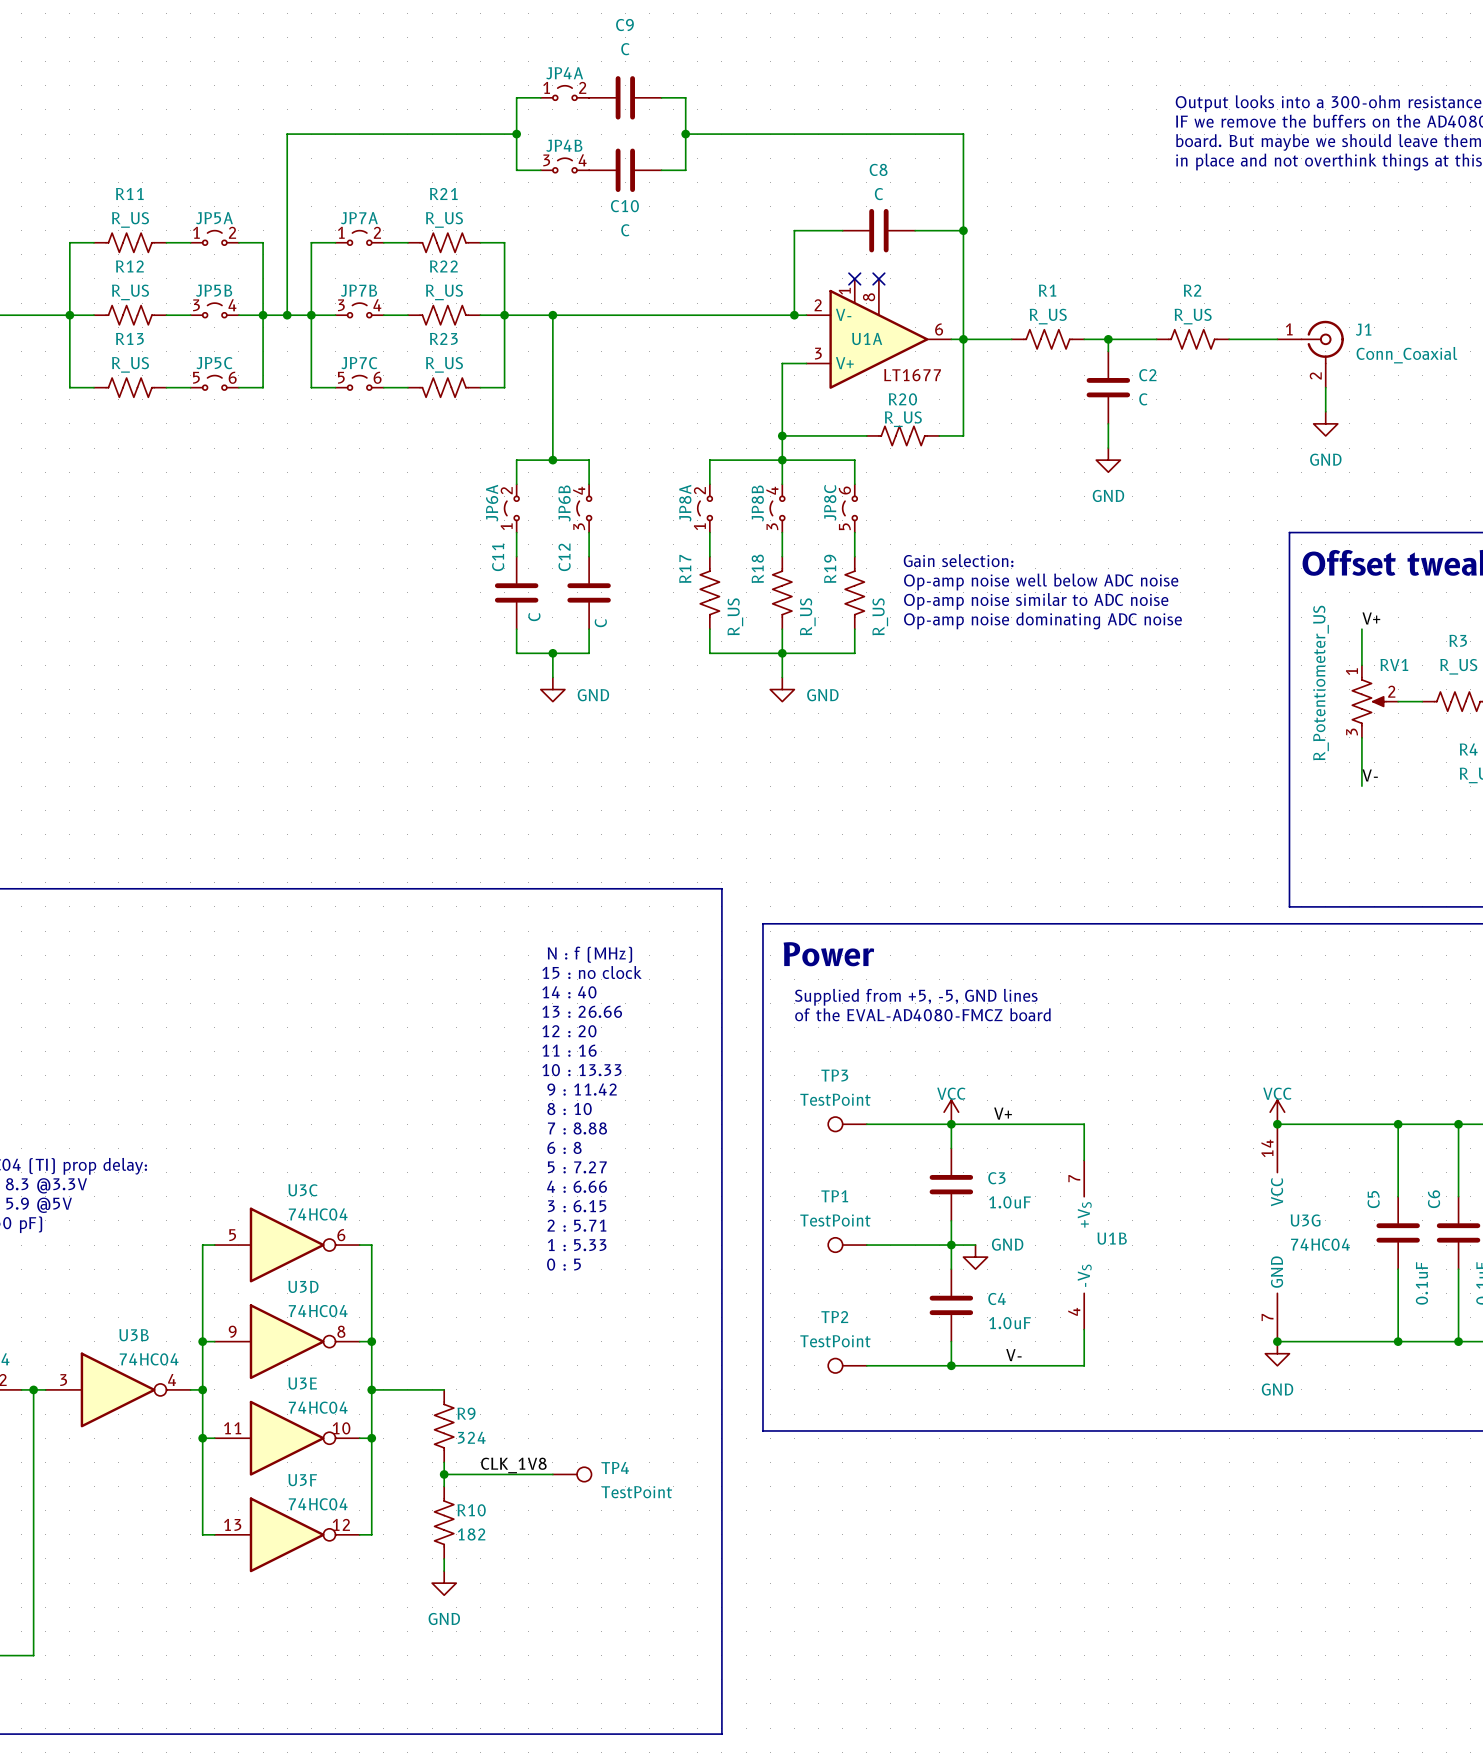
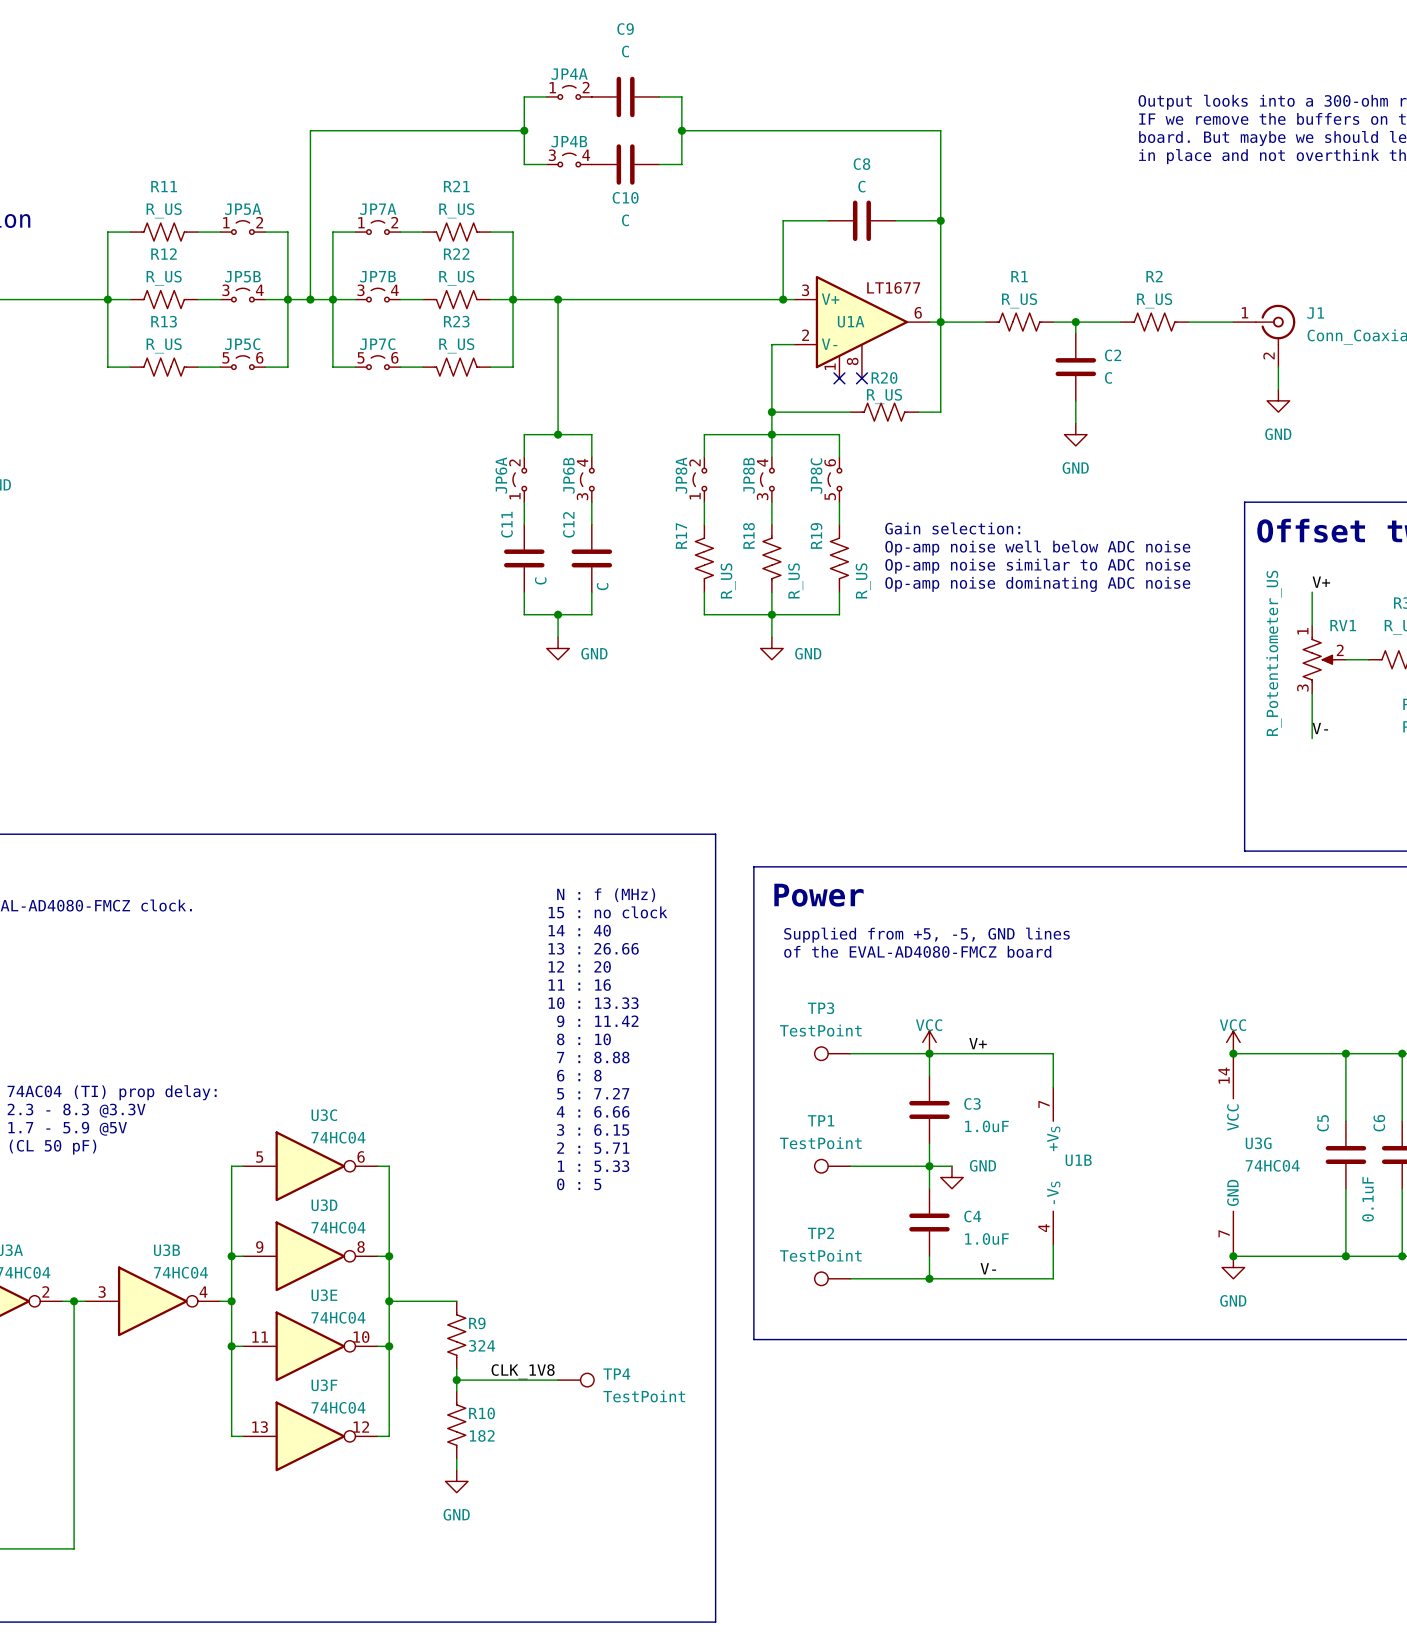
no-connect mark: (854, 278) -> none
no-connect mark: (878, 278) -> none
U1A flip: as is (878, 339) -> up-down (861, 322)
no-connect mark: none -> (839, 378)
no-connect mark: none -> (861, 378)

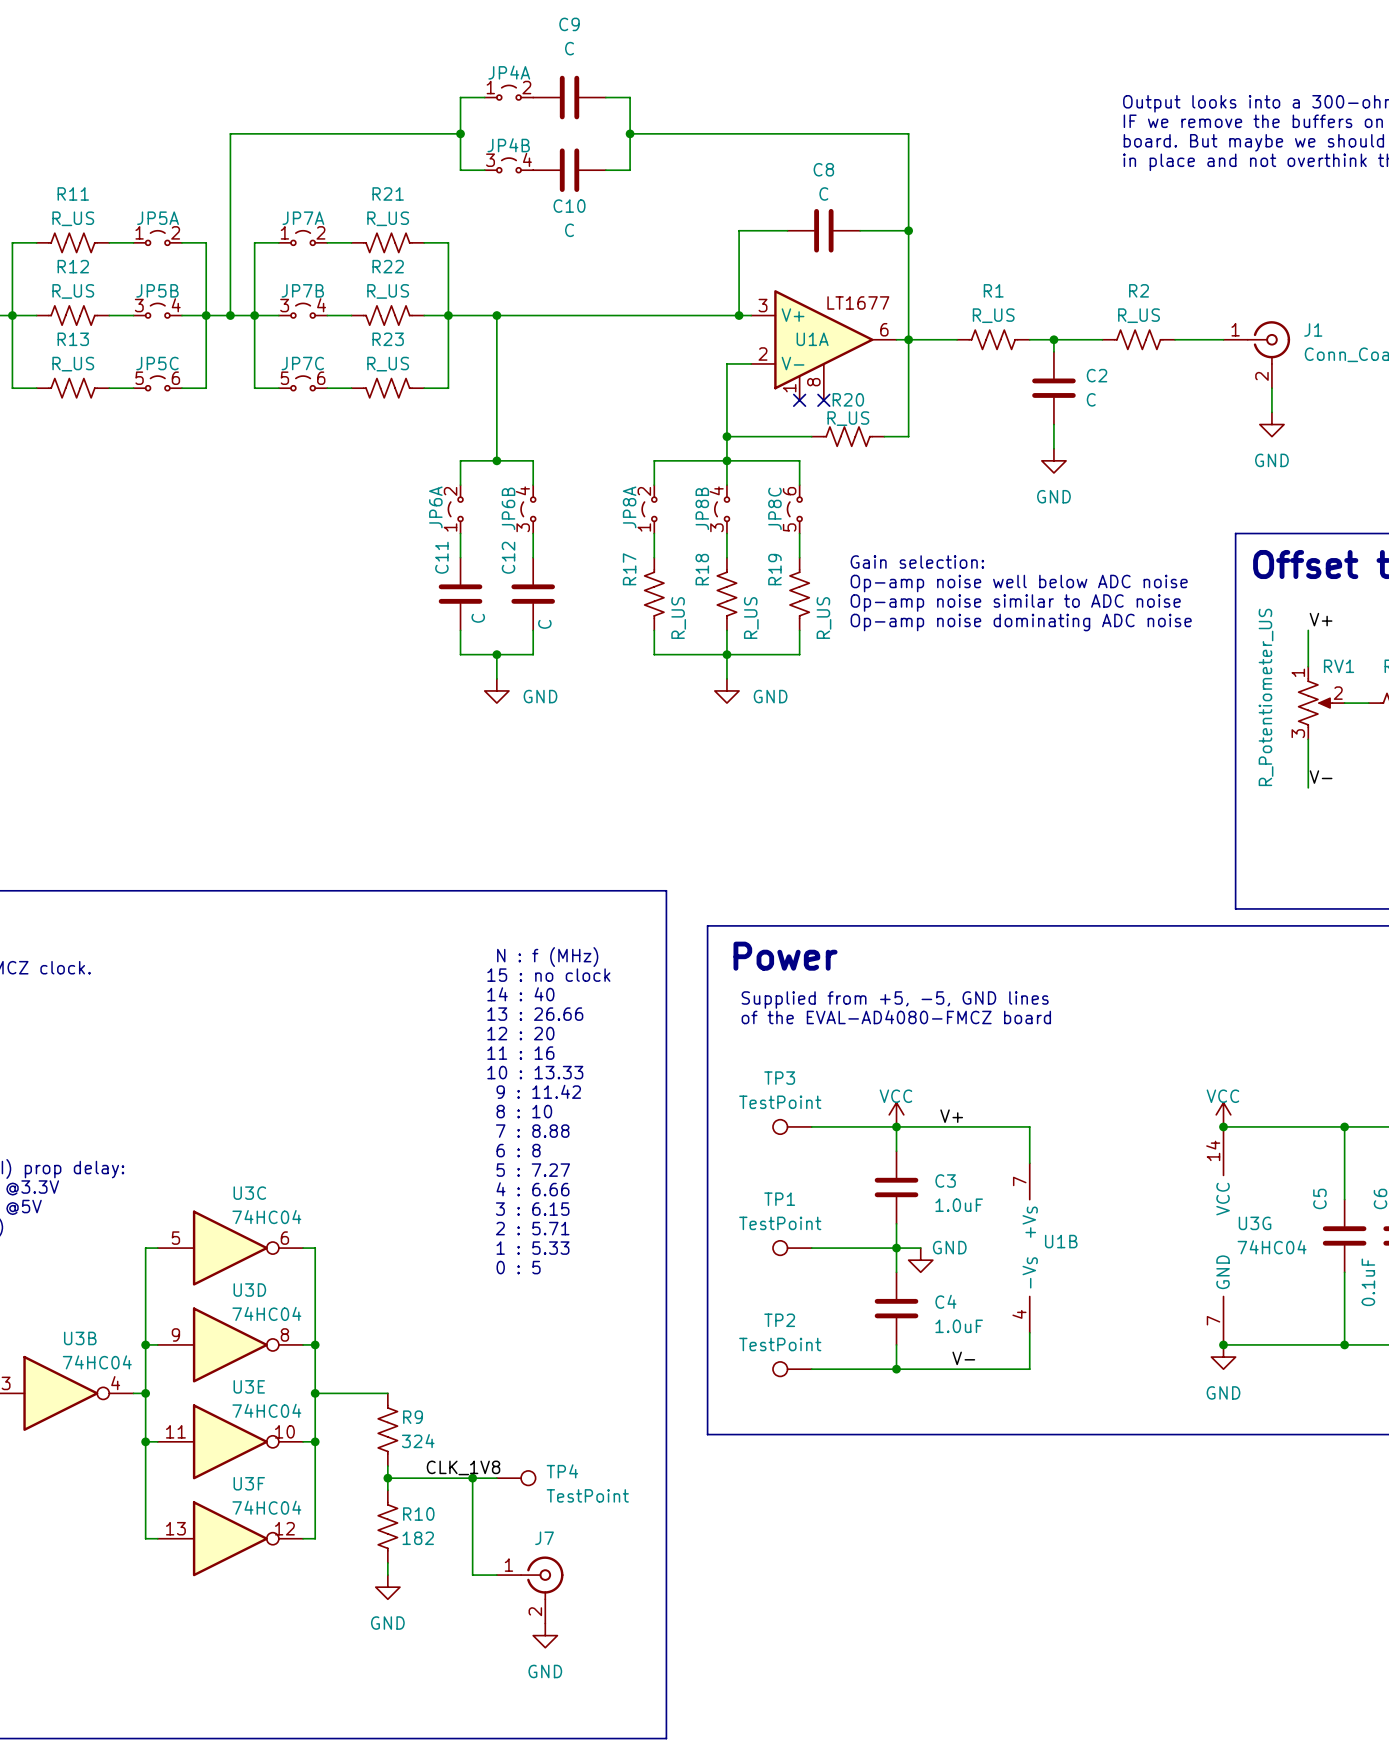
wire: none -> (472, 1478) (472, 1575) (496, 1575)
junction: none -> (472, 1478)
J7: none -> (530, 1589)
power symbol: none -> GND (545, 1635)

